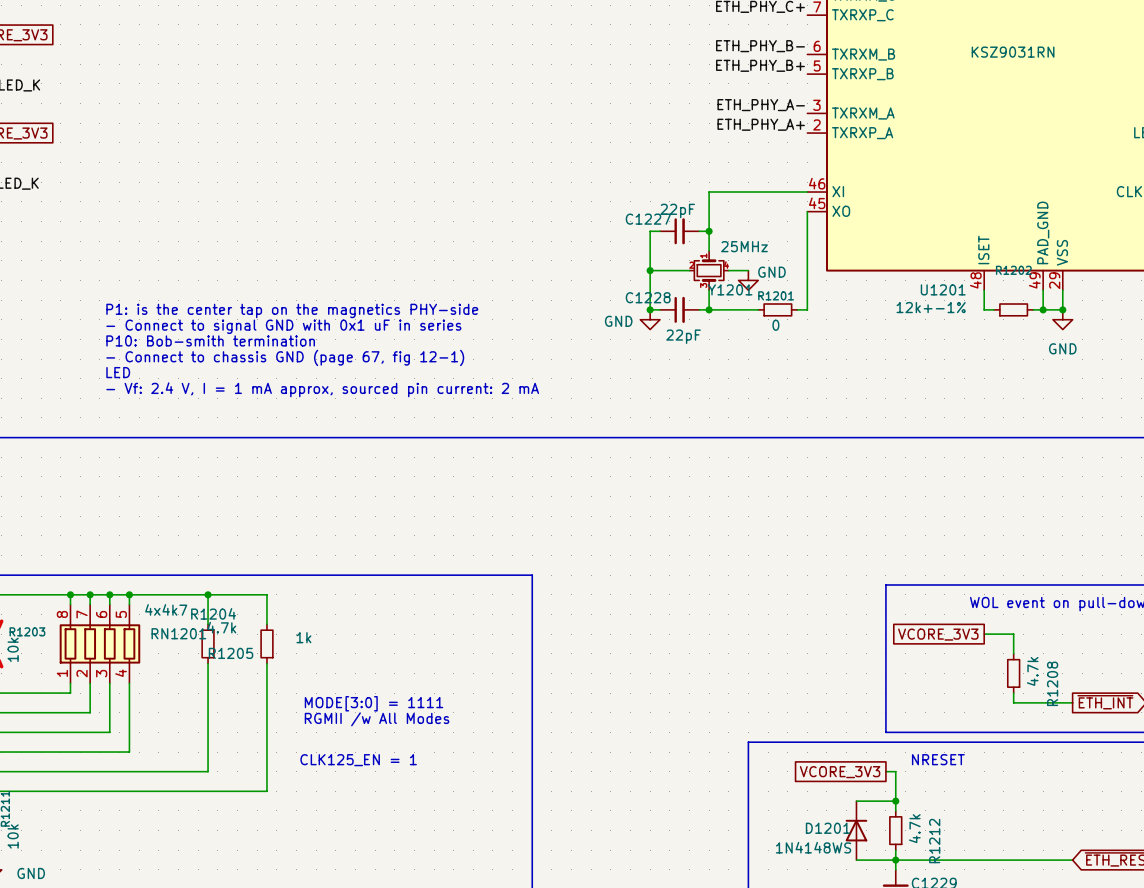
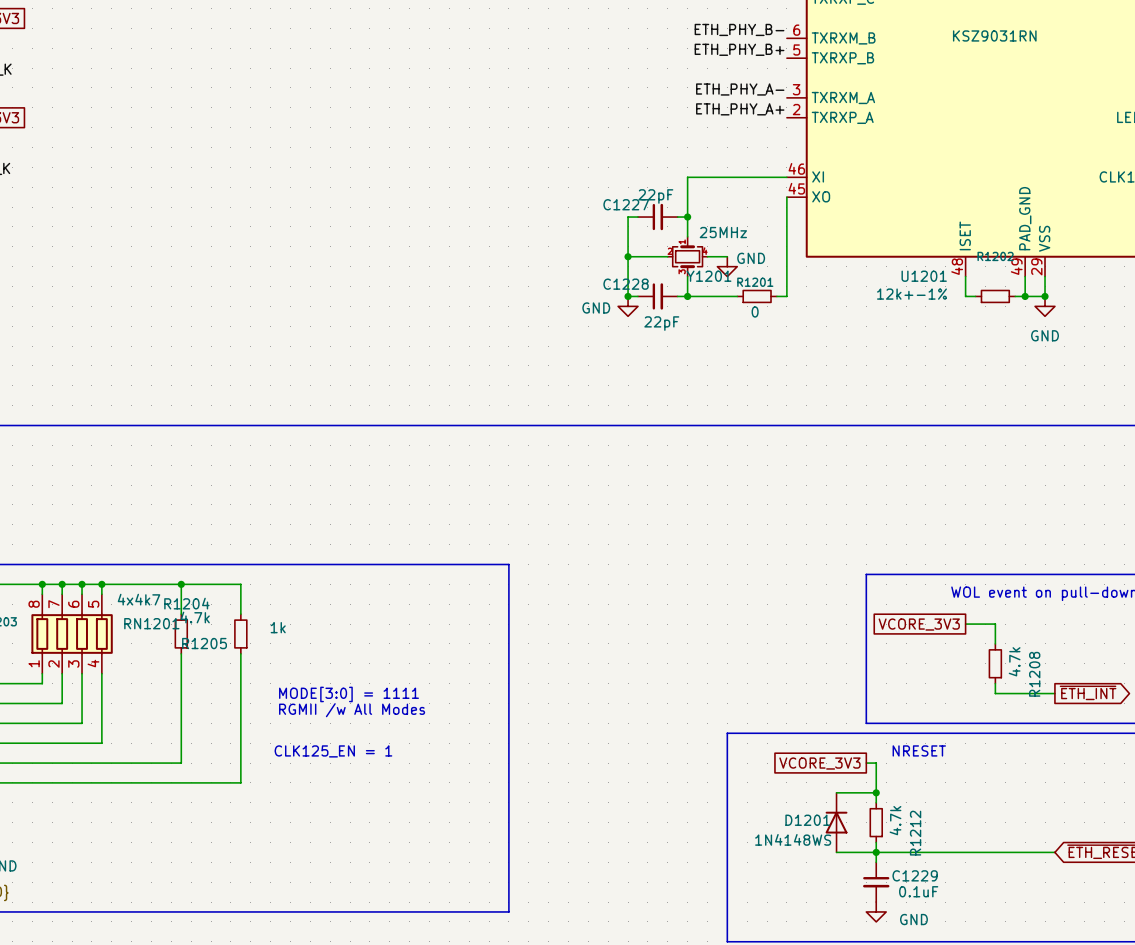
text: P1: is the center tap on the magnetics PHY-side (292, 310) -> none
text: - Connect to signal GND with 0x1 uF in series (283, 326) -> none
text: P10: Bob-smith termination (210, 340) -> none
text: - Connect to chassis GND (page 67, fig 12-1) (285, 357) -> none
text: LED (118, 372) -> none
text: - Vf: 2.4 V, I = 1 mA approx, sourced pin current: 2 mA (322, 389) -> none

